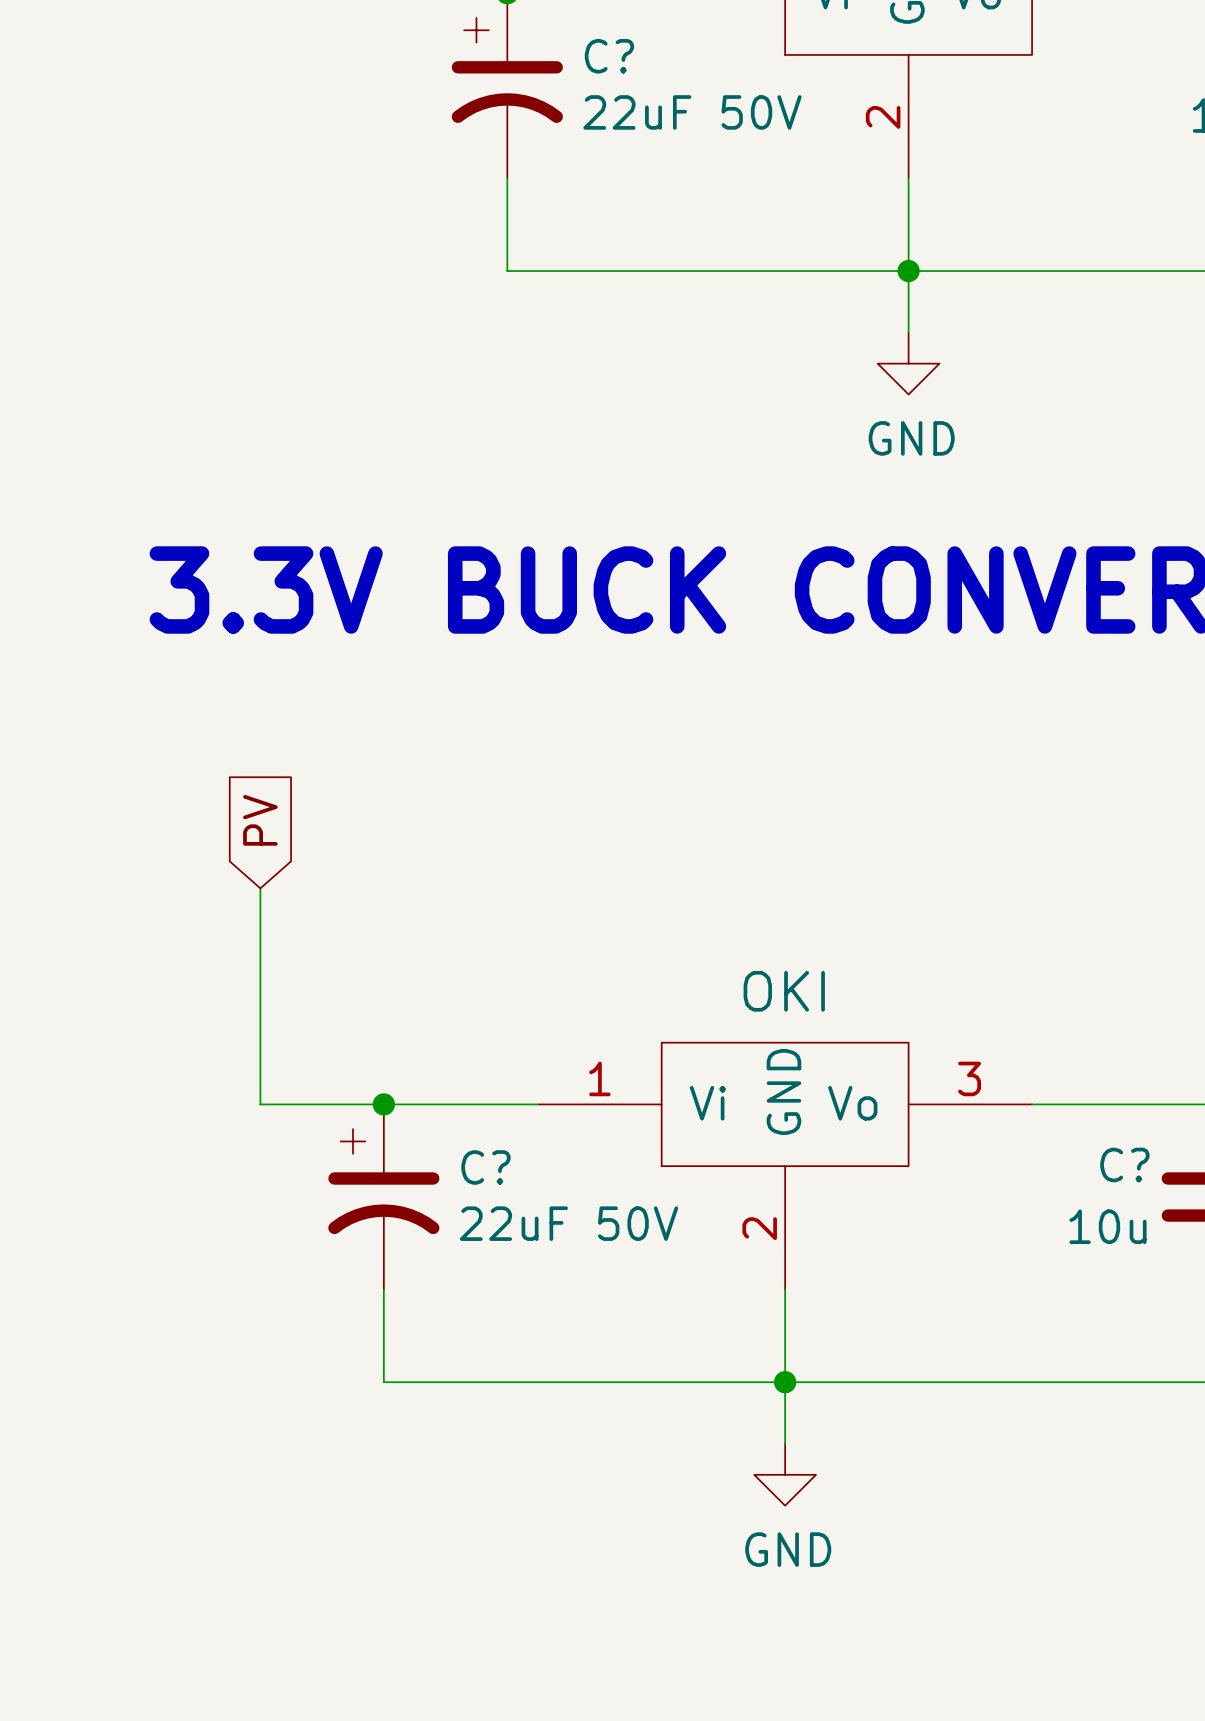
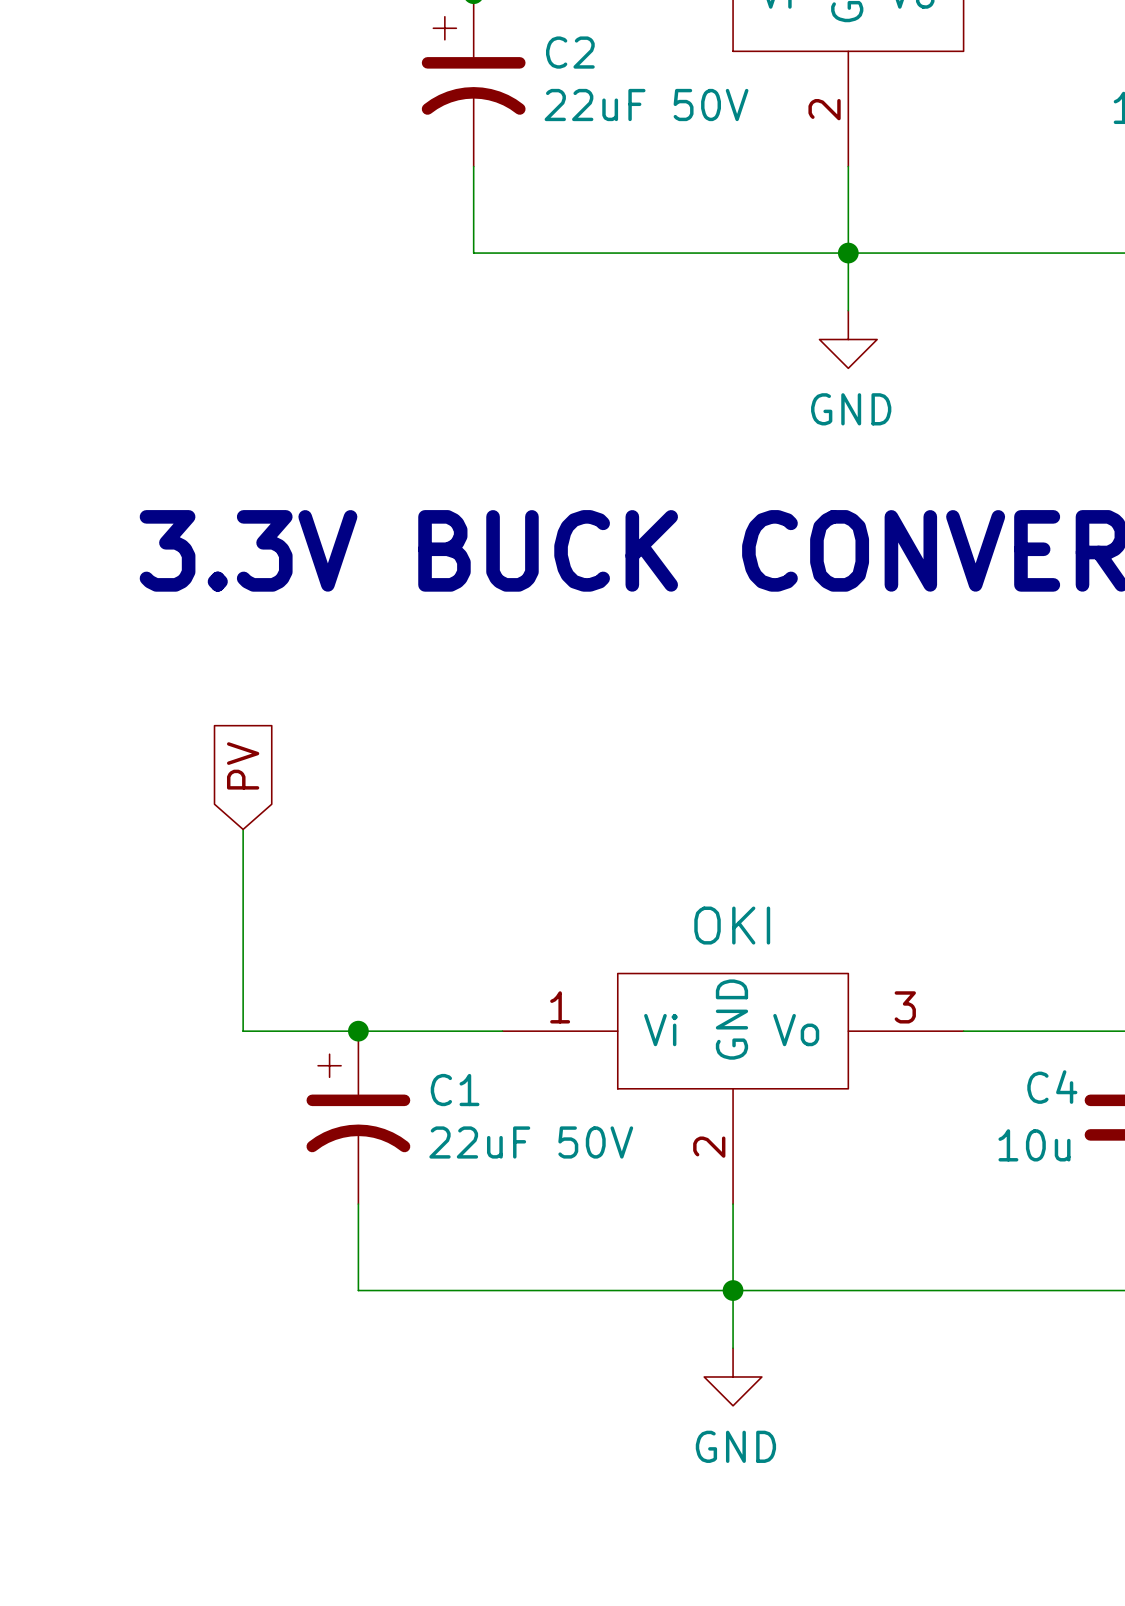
C? name: C? (609, 56) -> C2 (570, 52)
C? name: C? (1124, 1165) -> C4 (1052, 1087)
C? name: C? (485, 1167) -> C1 (455, 1090)

